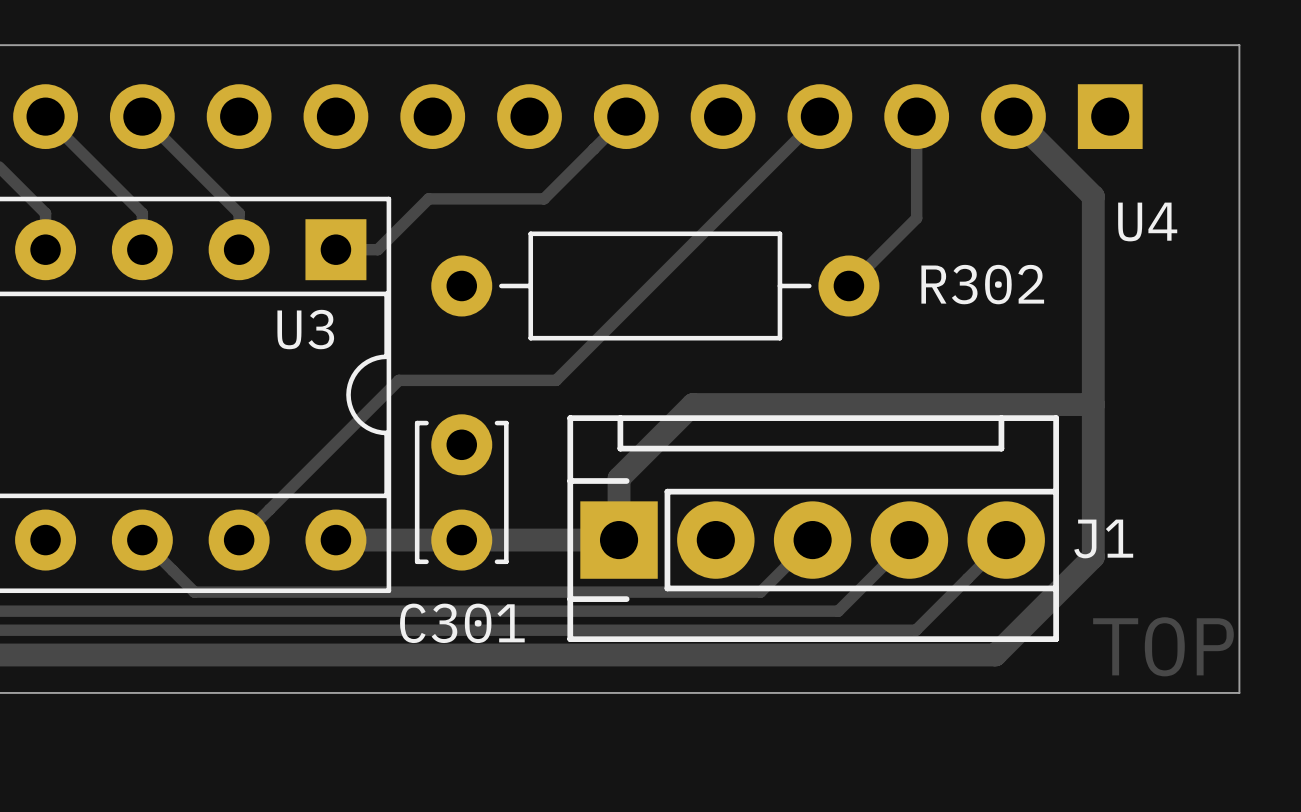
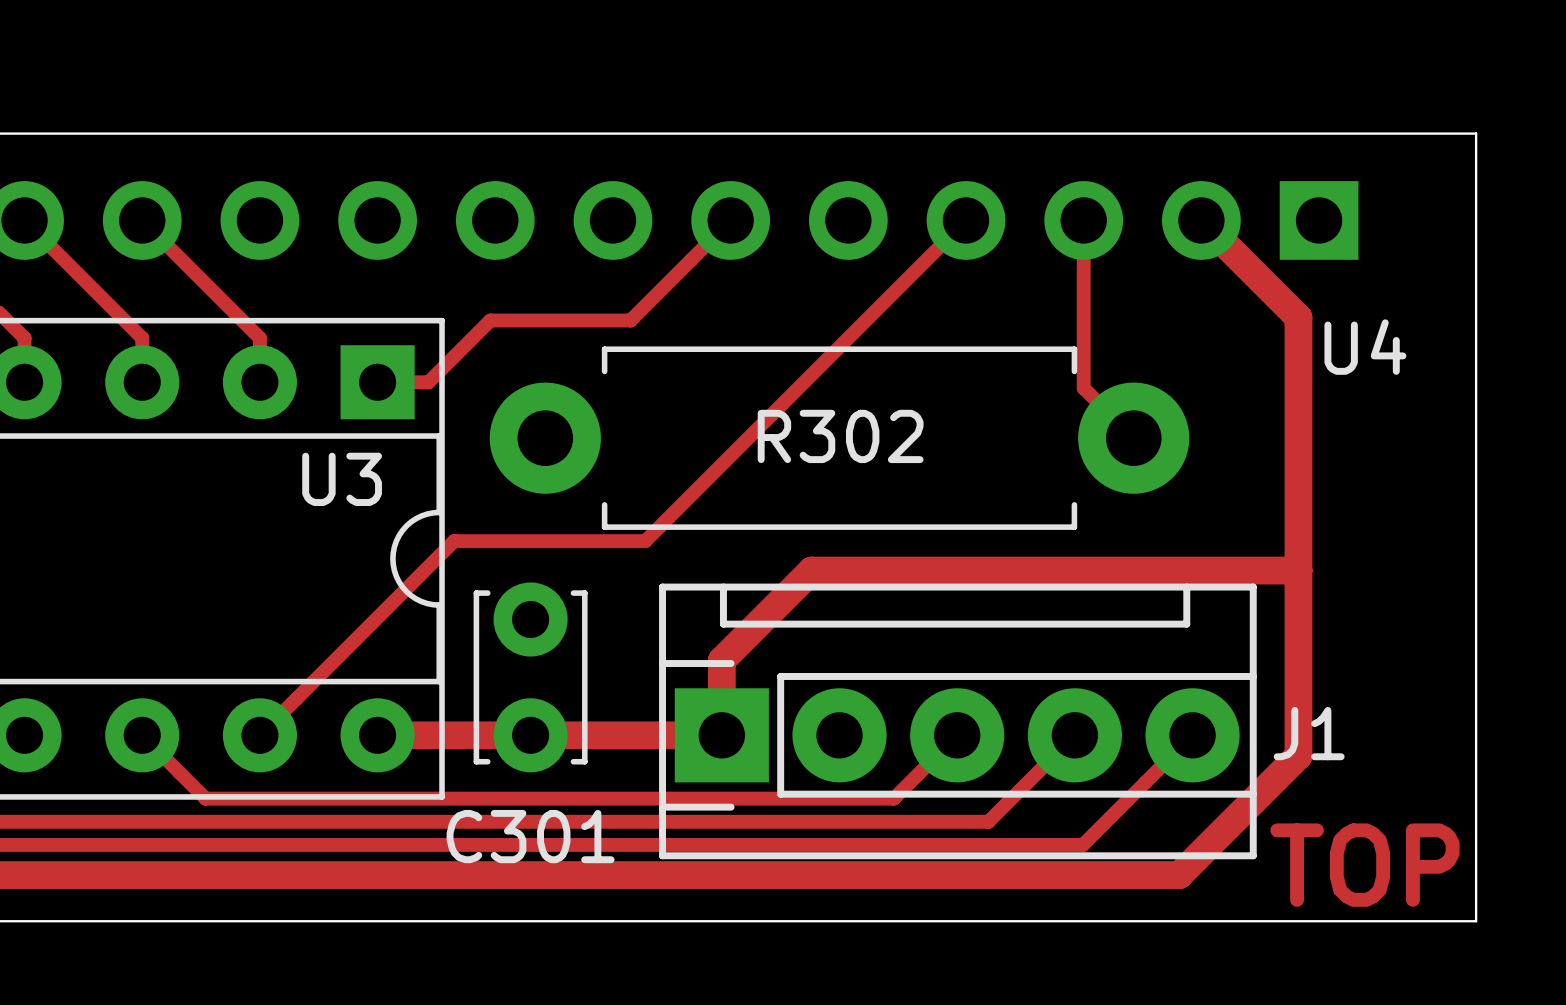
track: (916, 218) (848, 285) -> (1083, 344) (1083, 388) (1133, 438)
R302 footprint: [431, 231, 880, 341] -> [489, 346, 1190, 530]
R302 name position: R302 (982, 284) -> R302 (840, 436)

